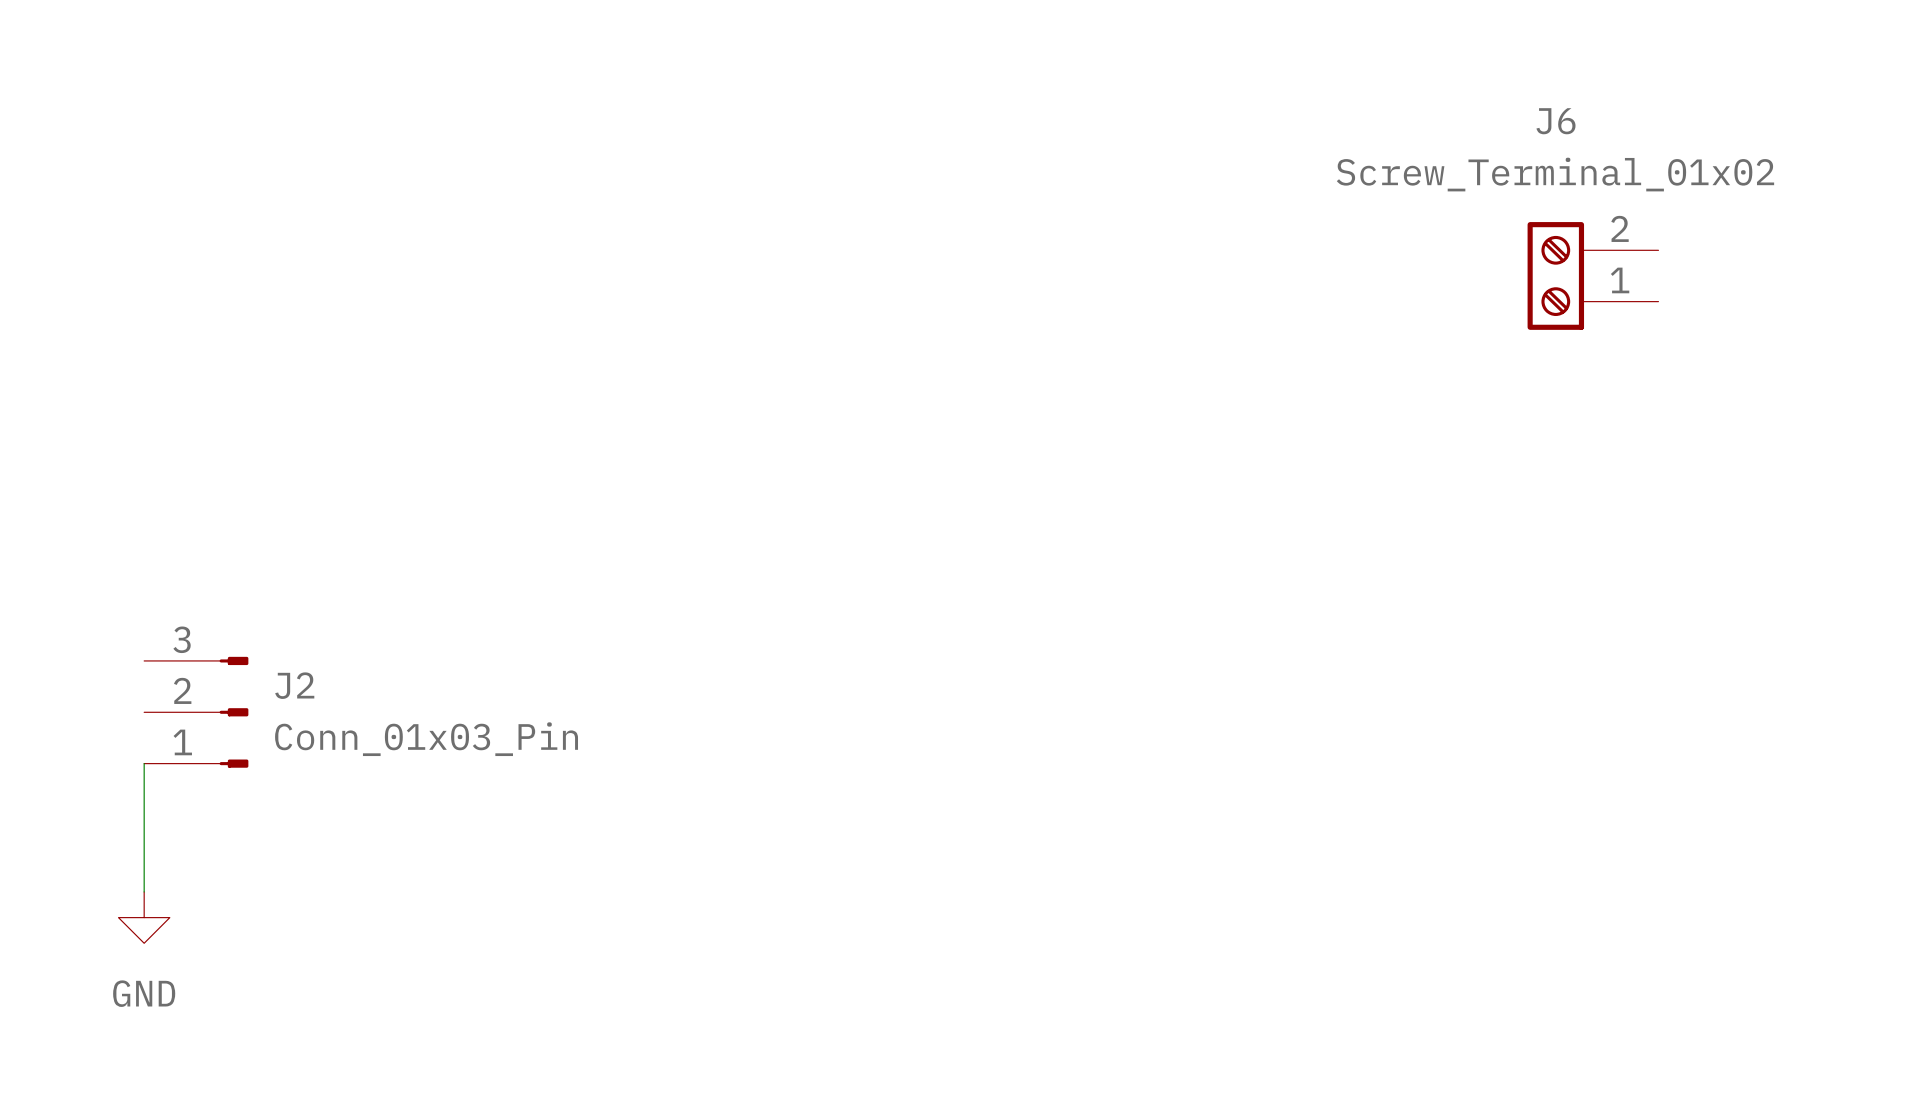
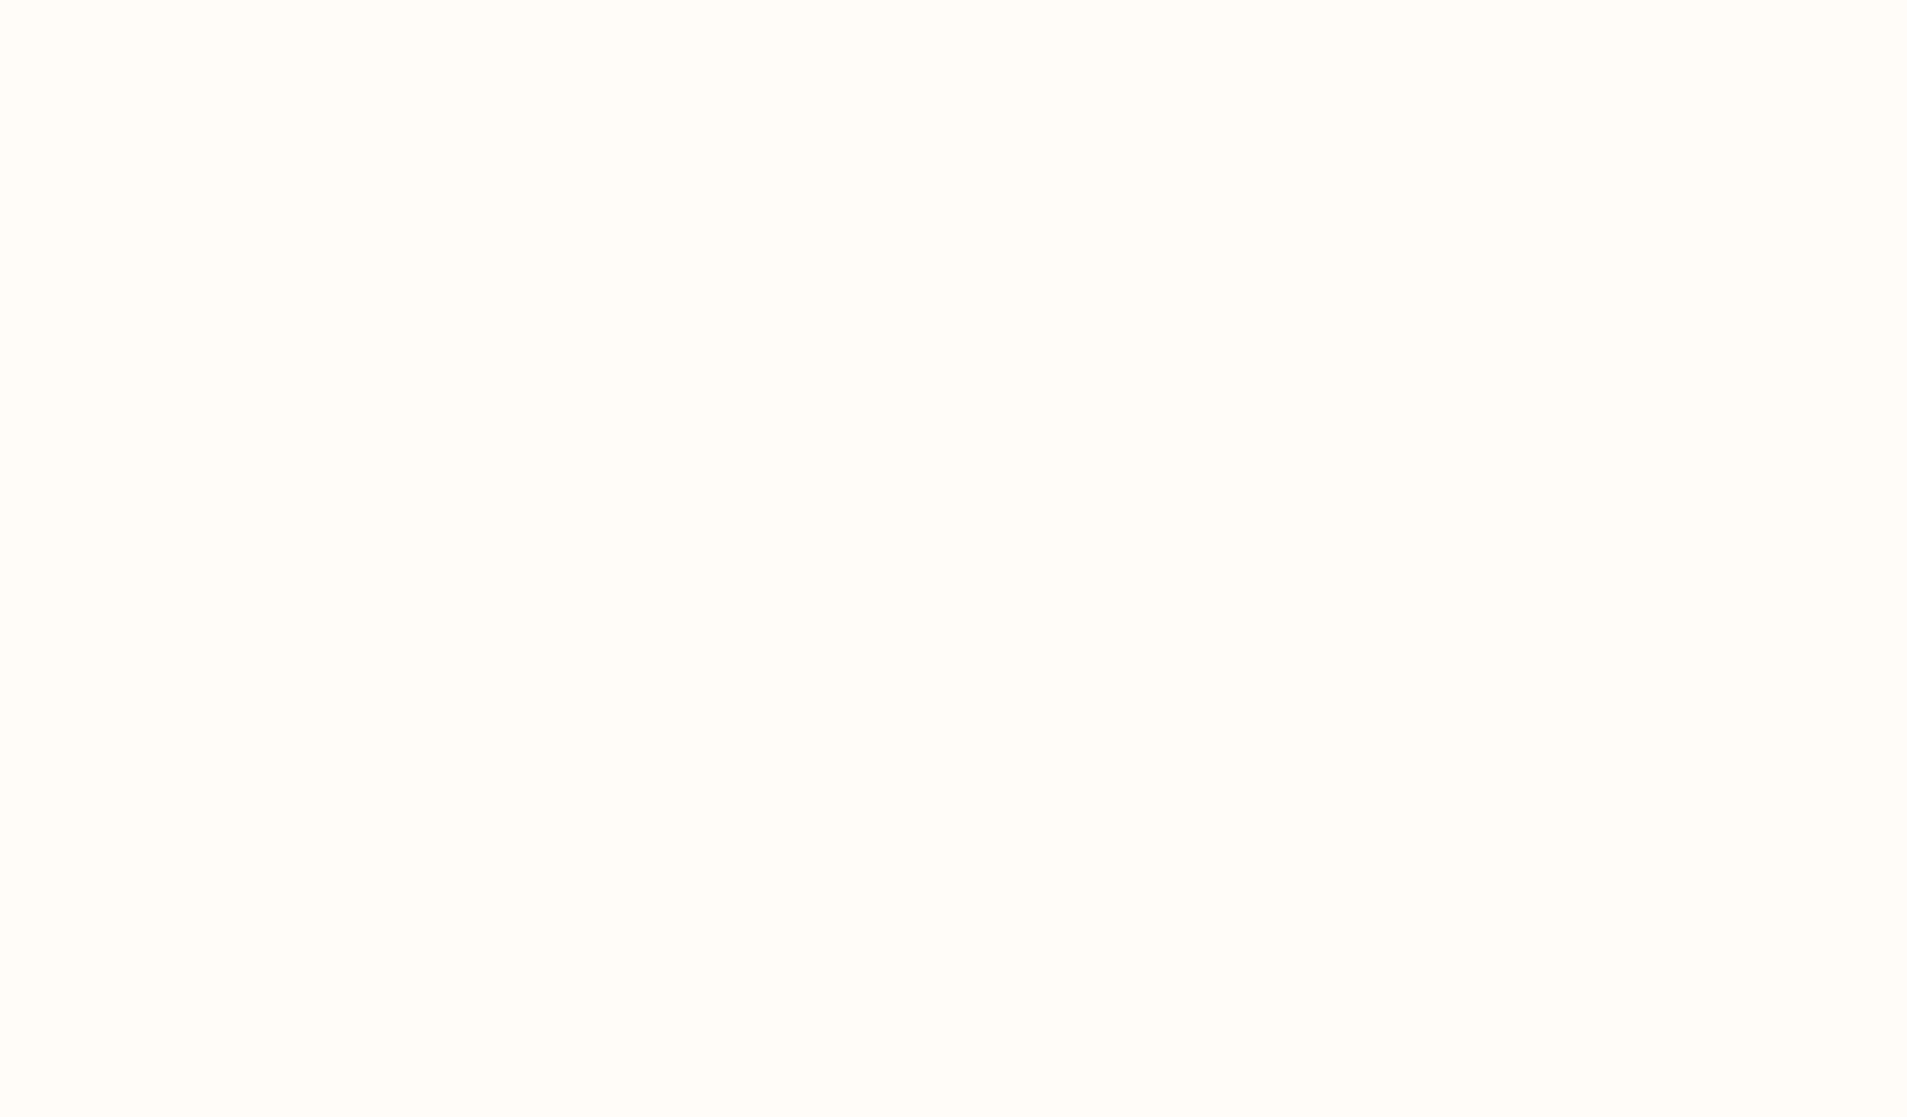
J6: Screw_Terminal_01x02 (1593, 275) -> none
J2: Conn_01x03_Pin (196, 712) -> none
wire: (144, 763) (144, 891) -> none
power symbol: GND (144, 917) -> none

